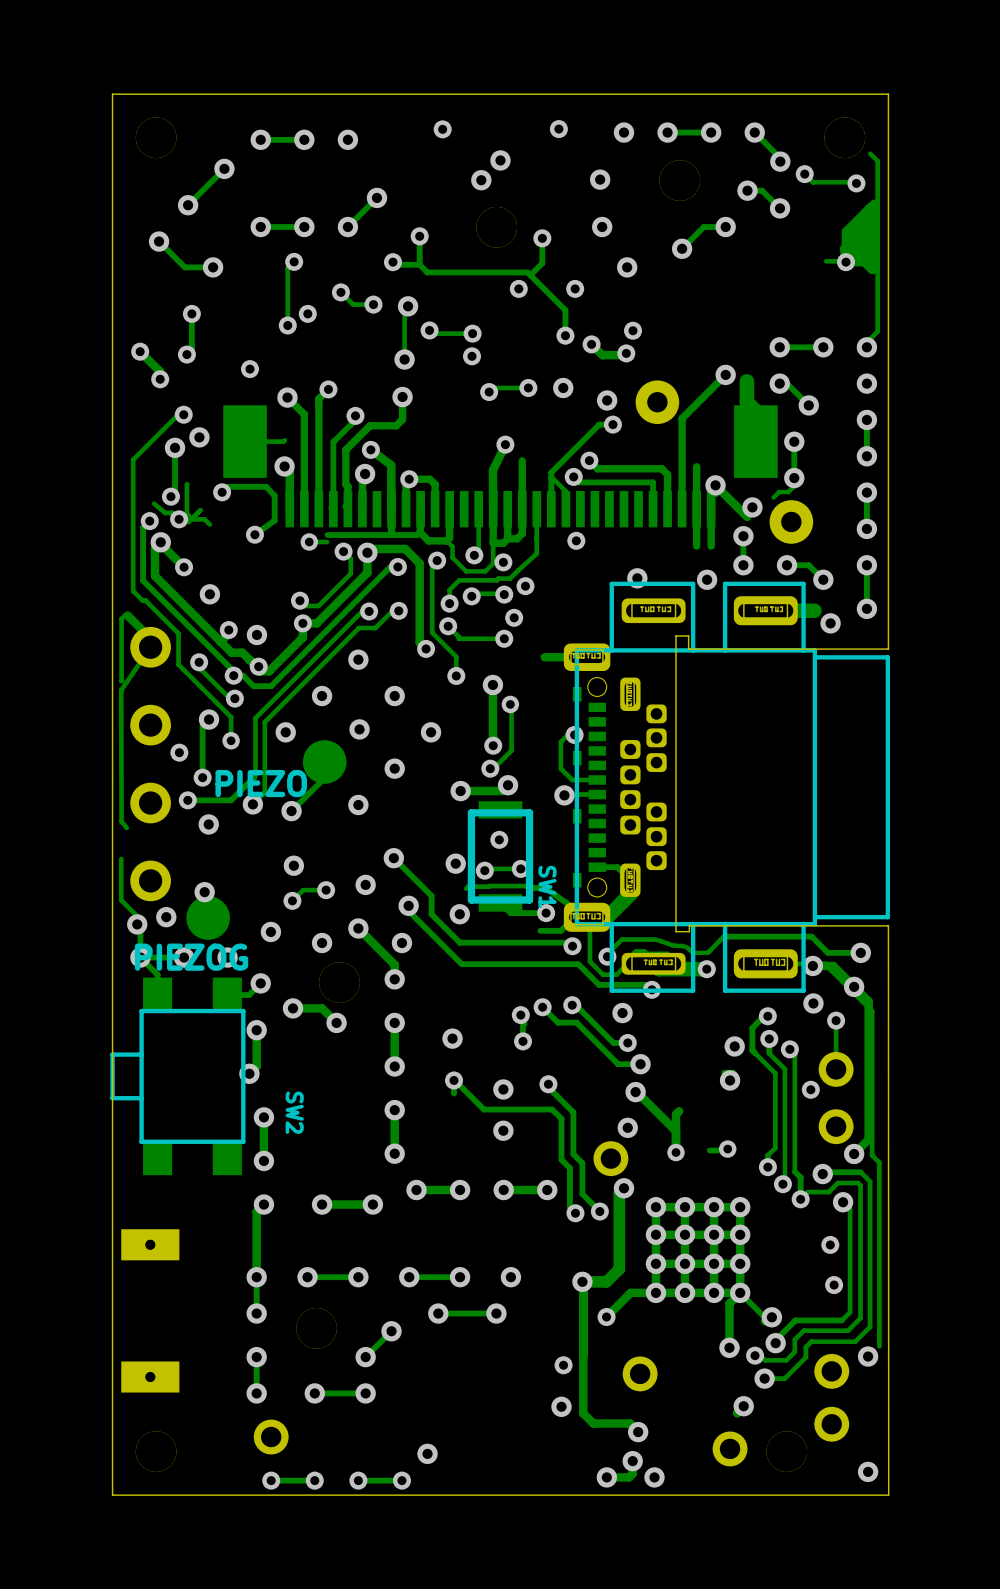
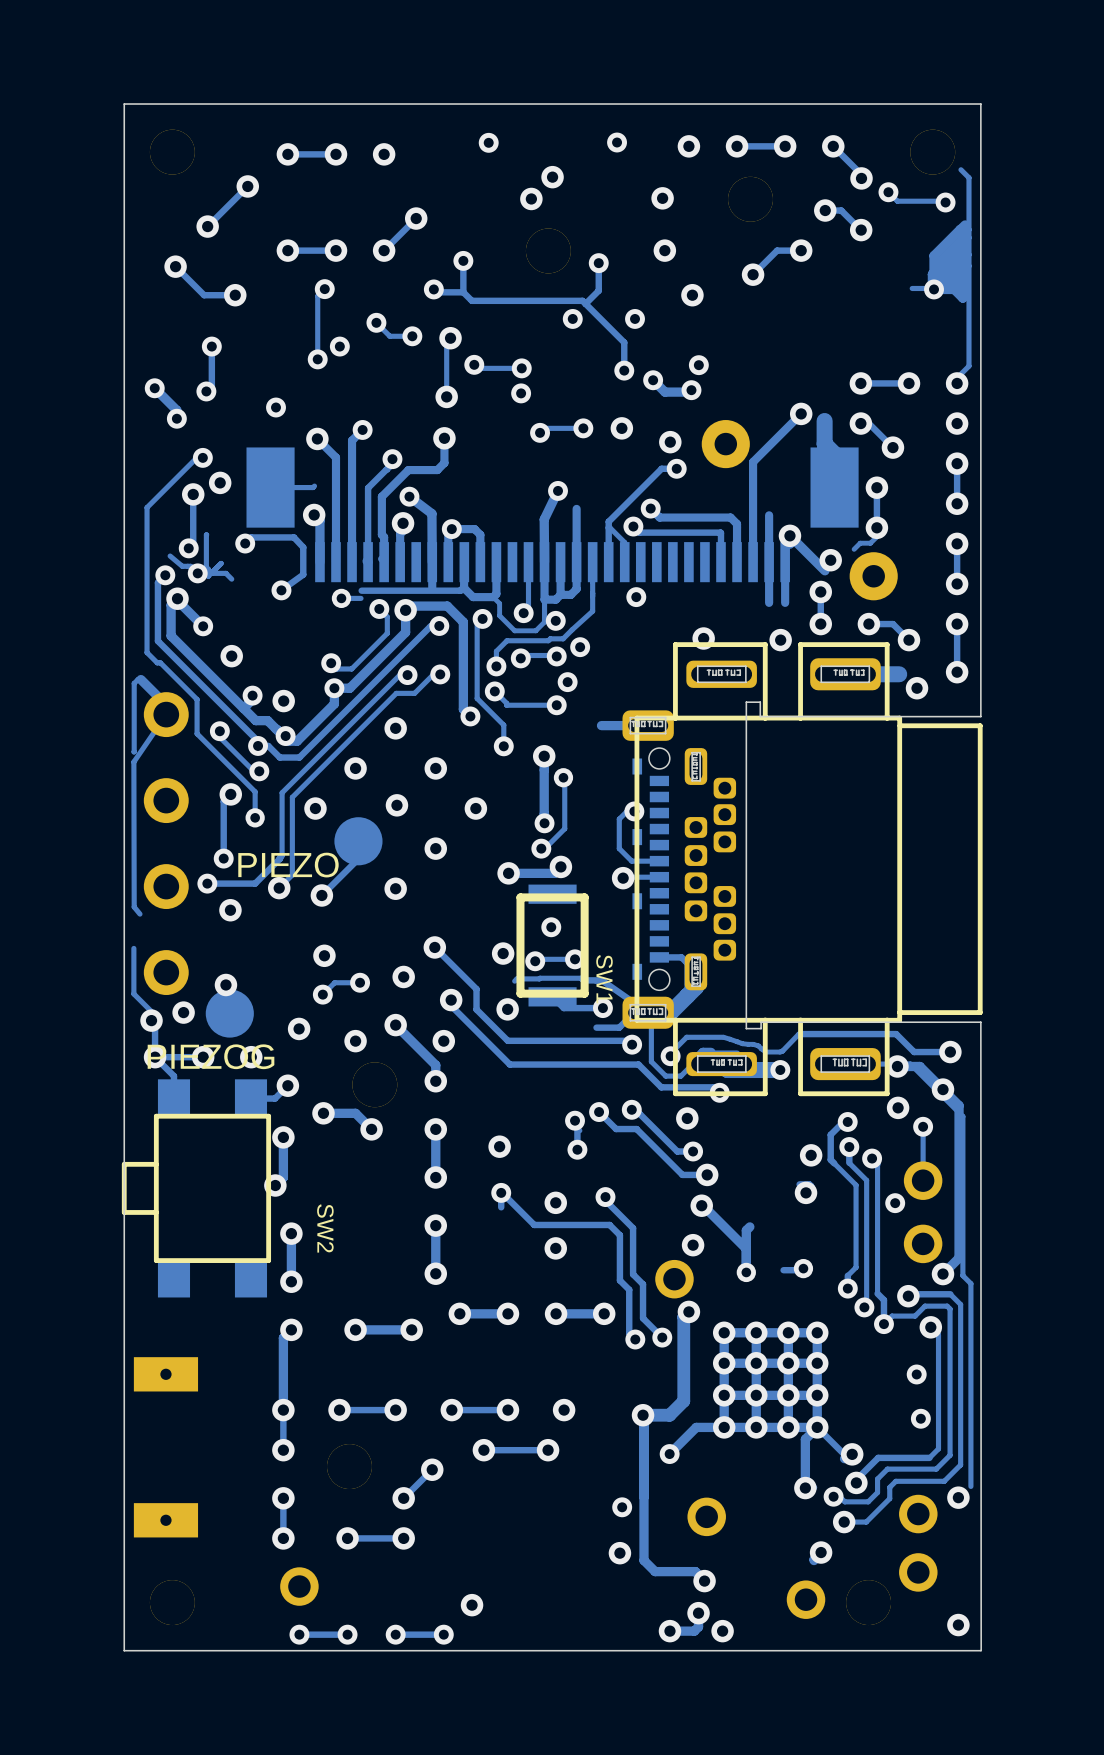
via: (179, 752) -> none

